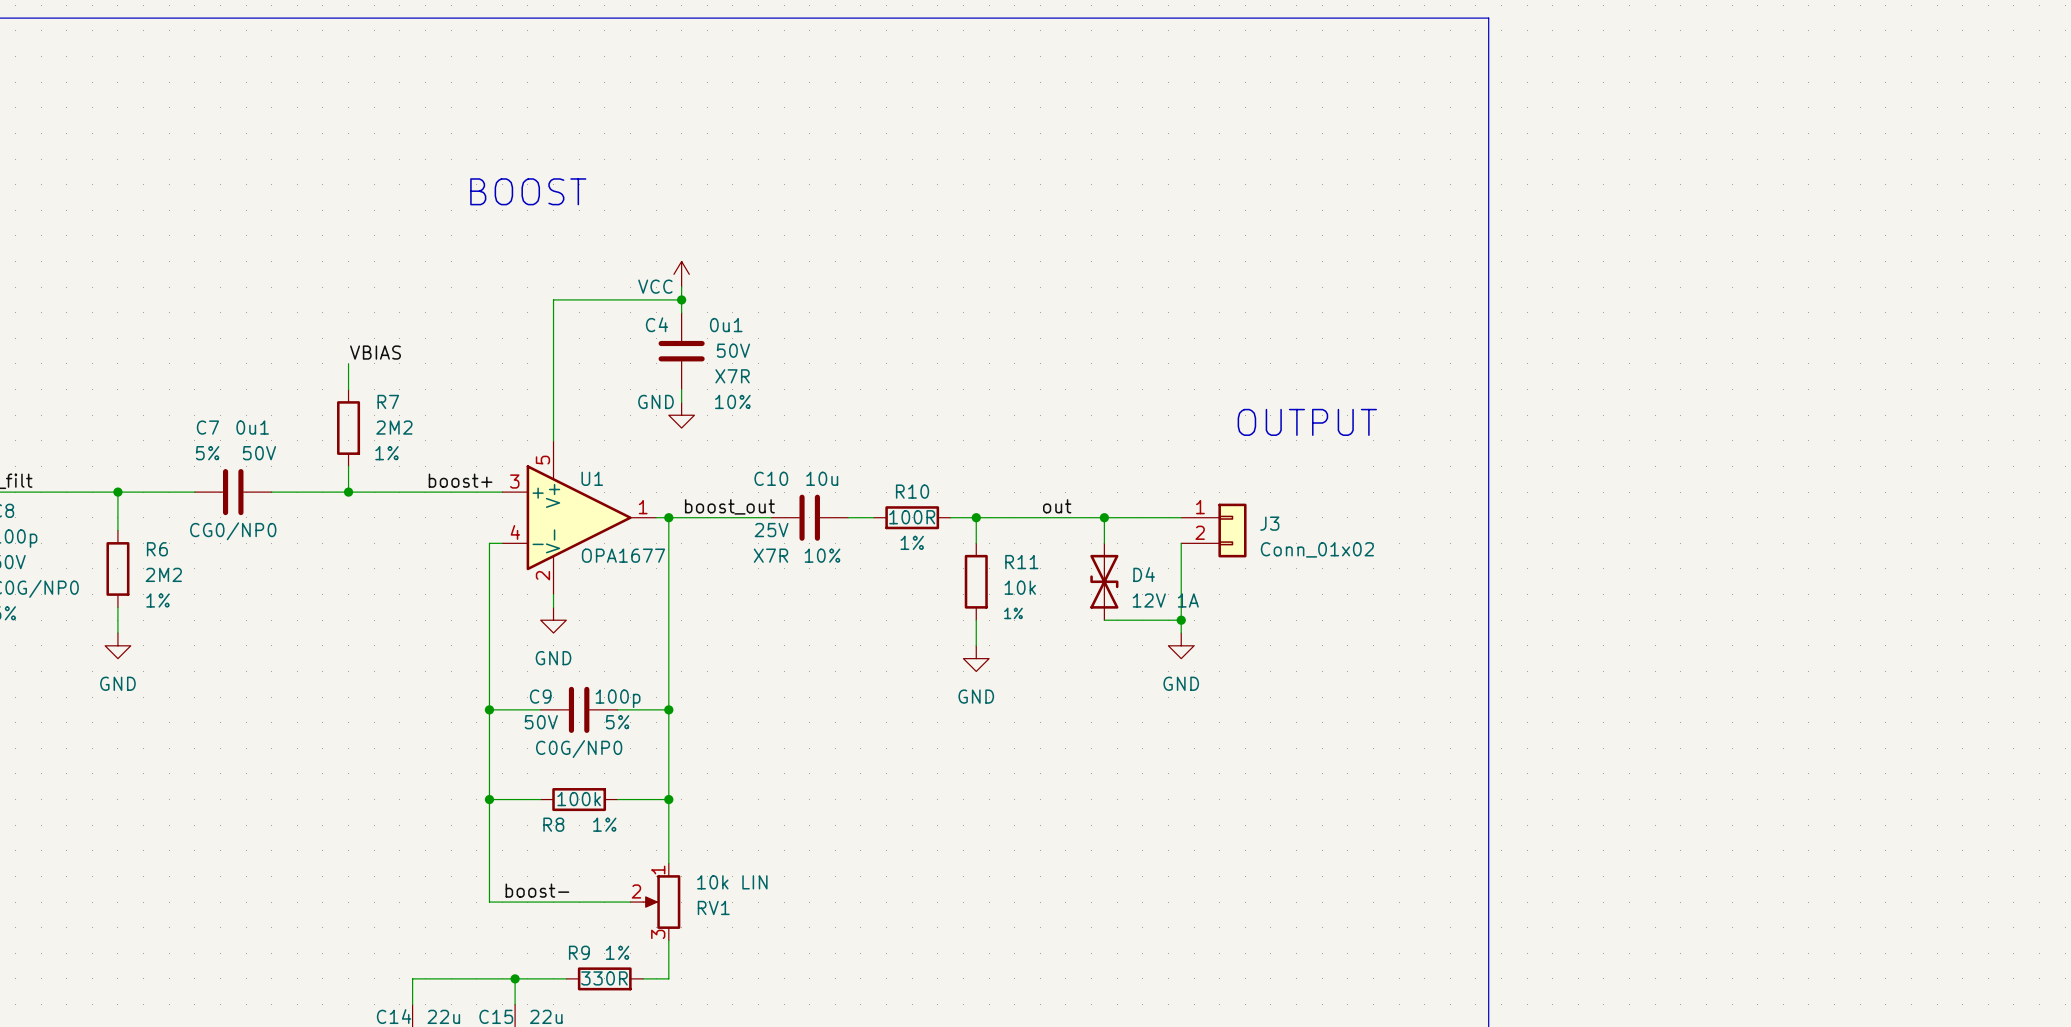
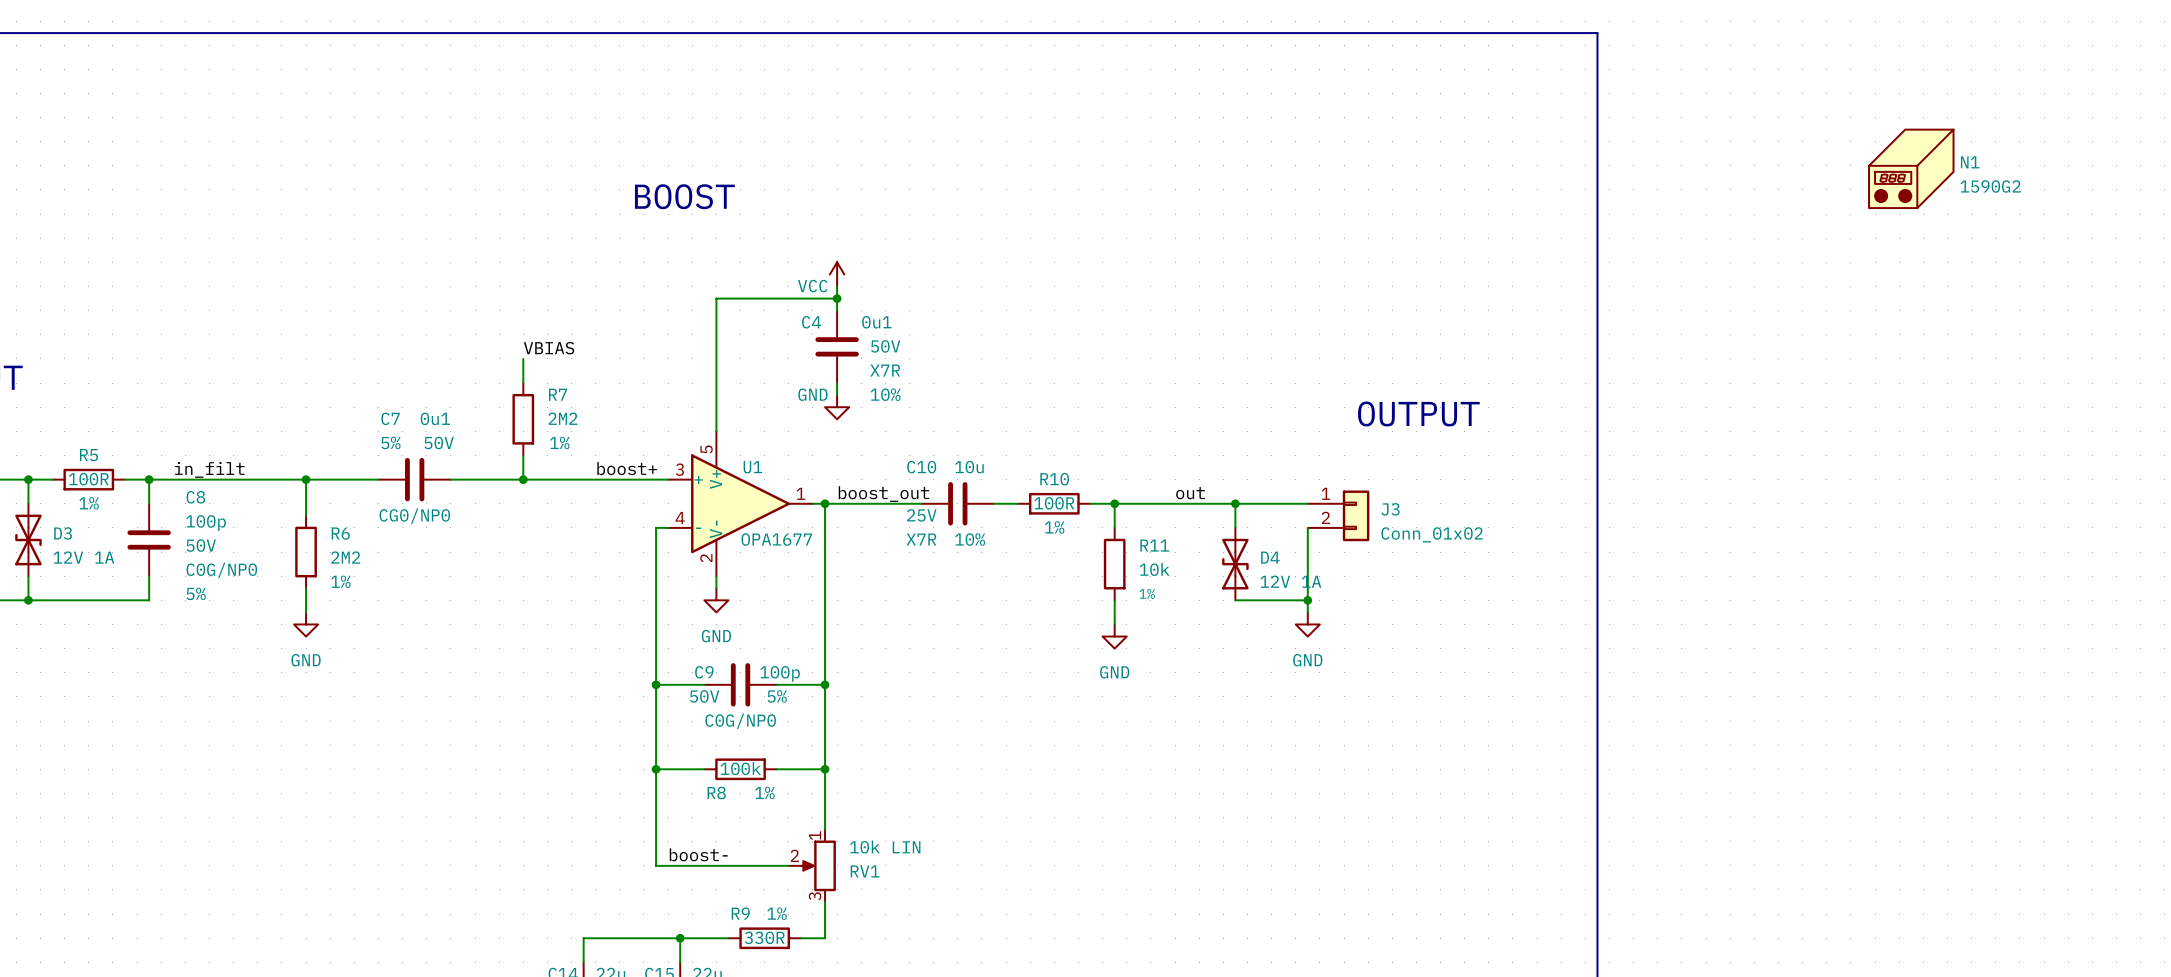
N1: none -> 1590G2 (1911, 168)

